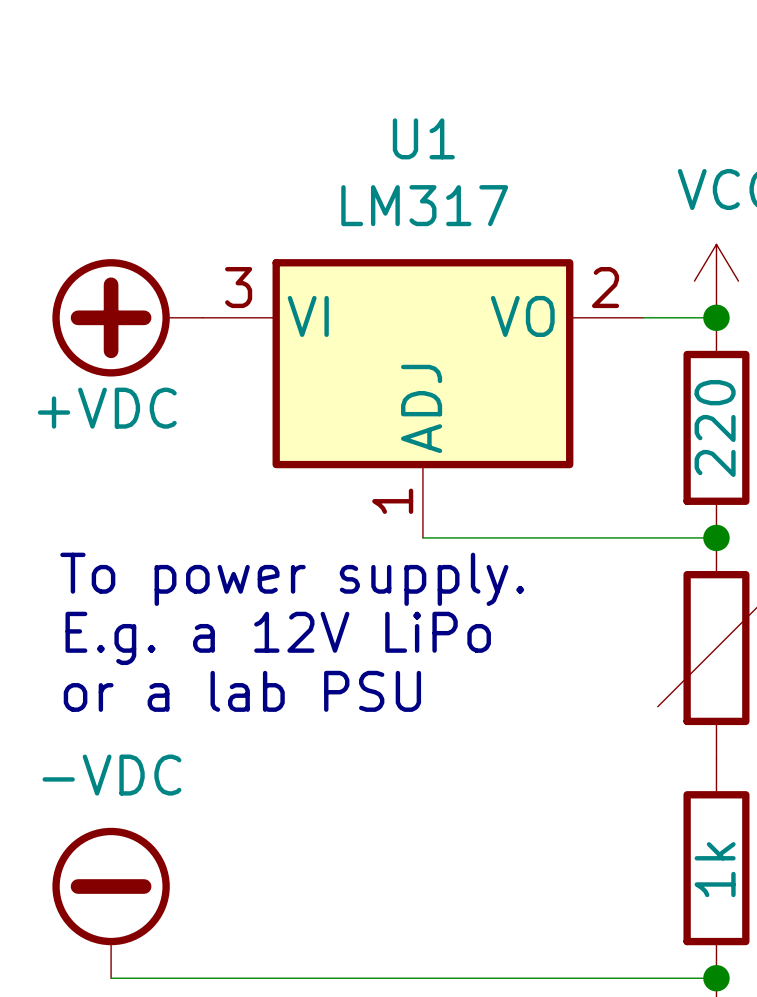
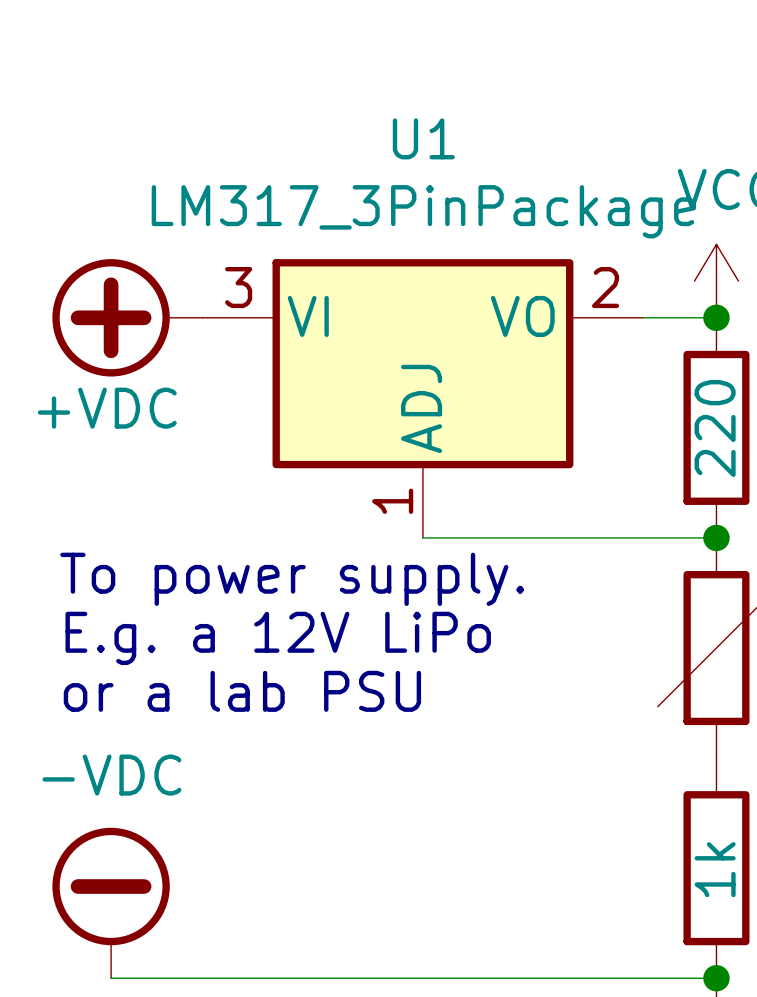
U1 value: LM317 (424, 205) -> LM317_3PinPackage (423, 211)

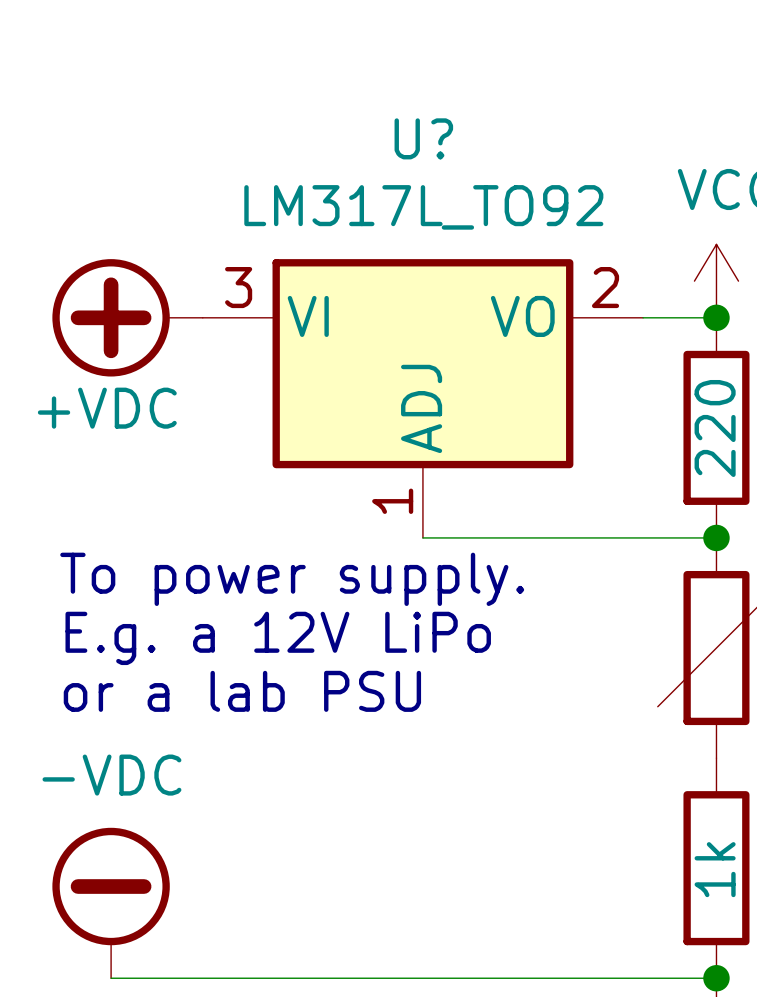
U1 name: U1 (423, 138) -> U? (423, 138)
U1 value: LM317_3PinPackage (423, 211) -> LM317L_TO92 (423, 207)

